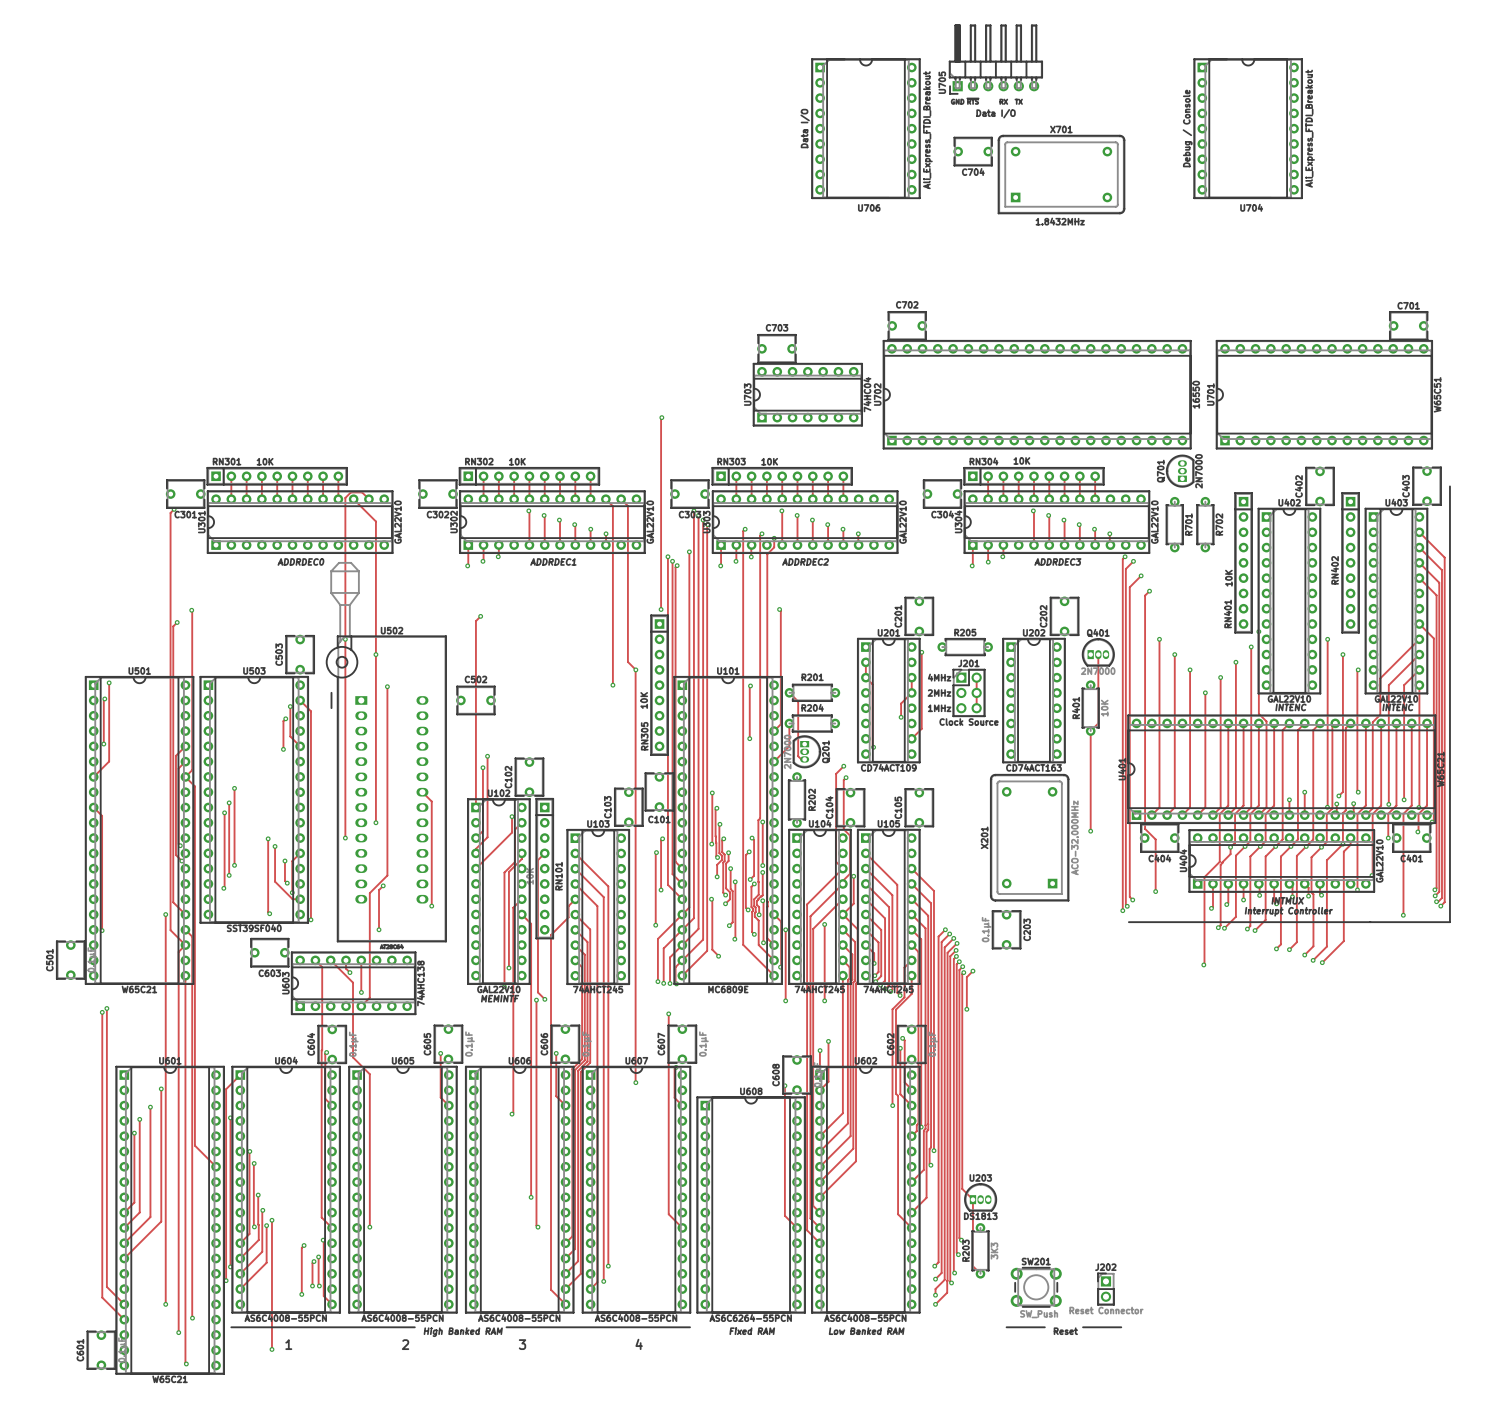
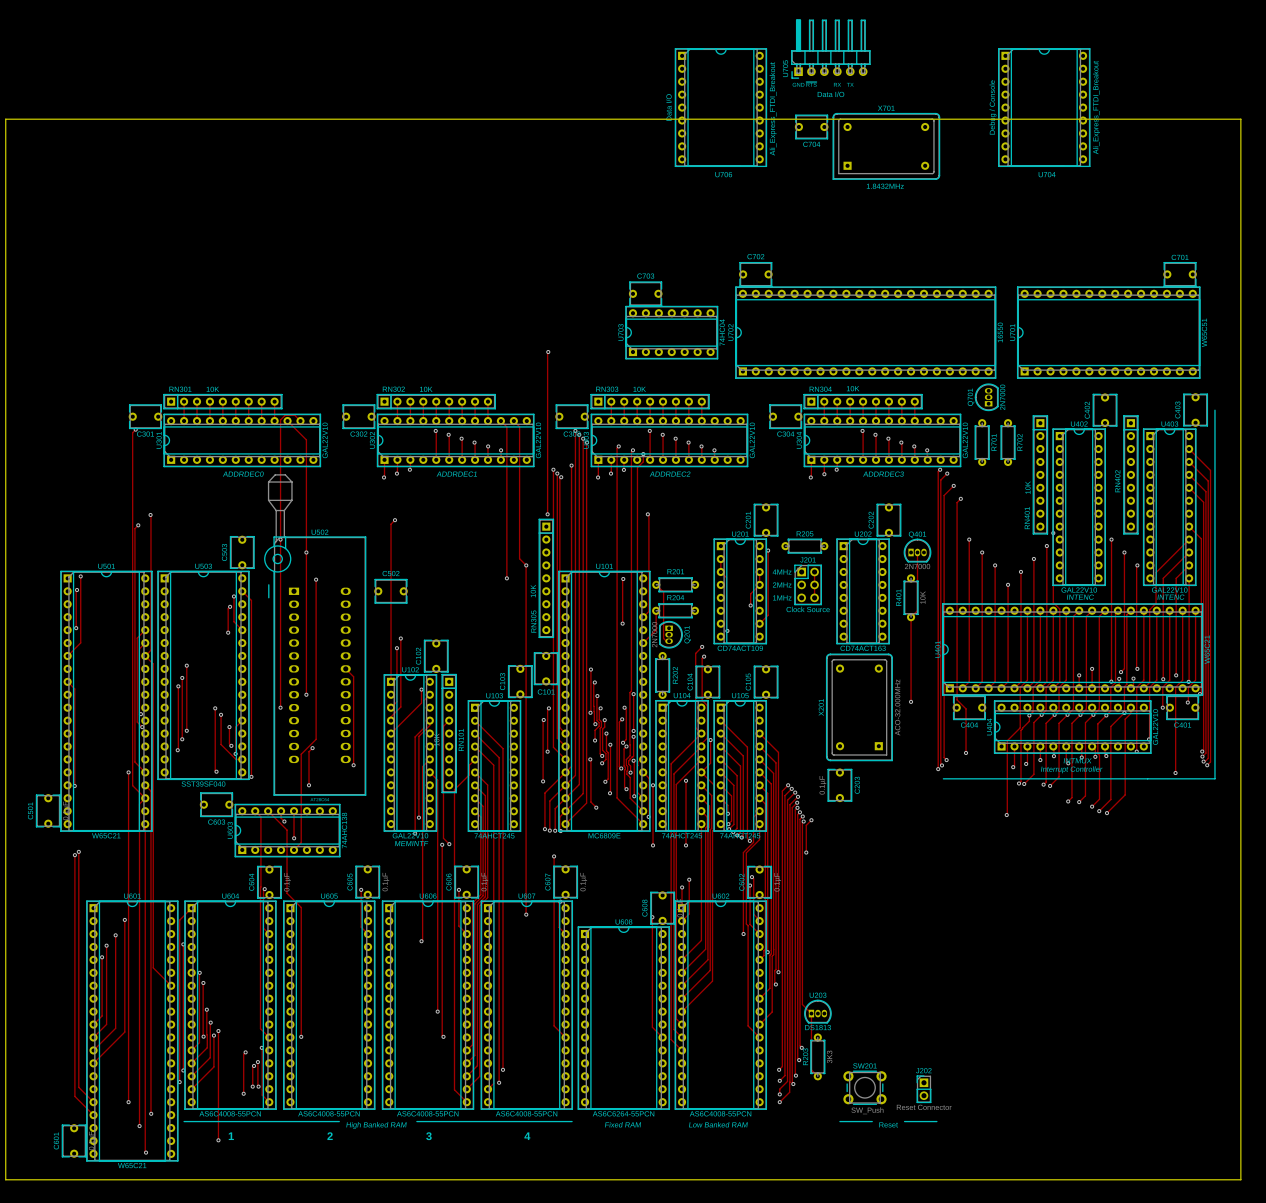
board edge: none -> (5, 119) (1240, 119) (1240, 1179) (5, 1179) (5, 119)

